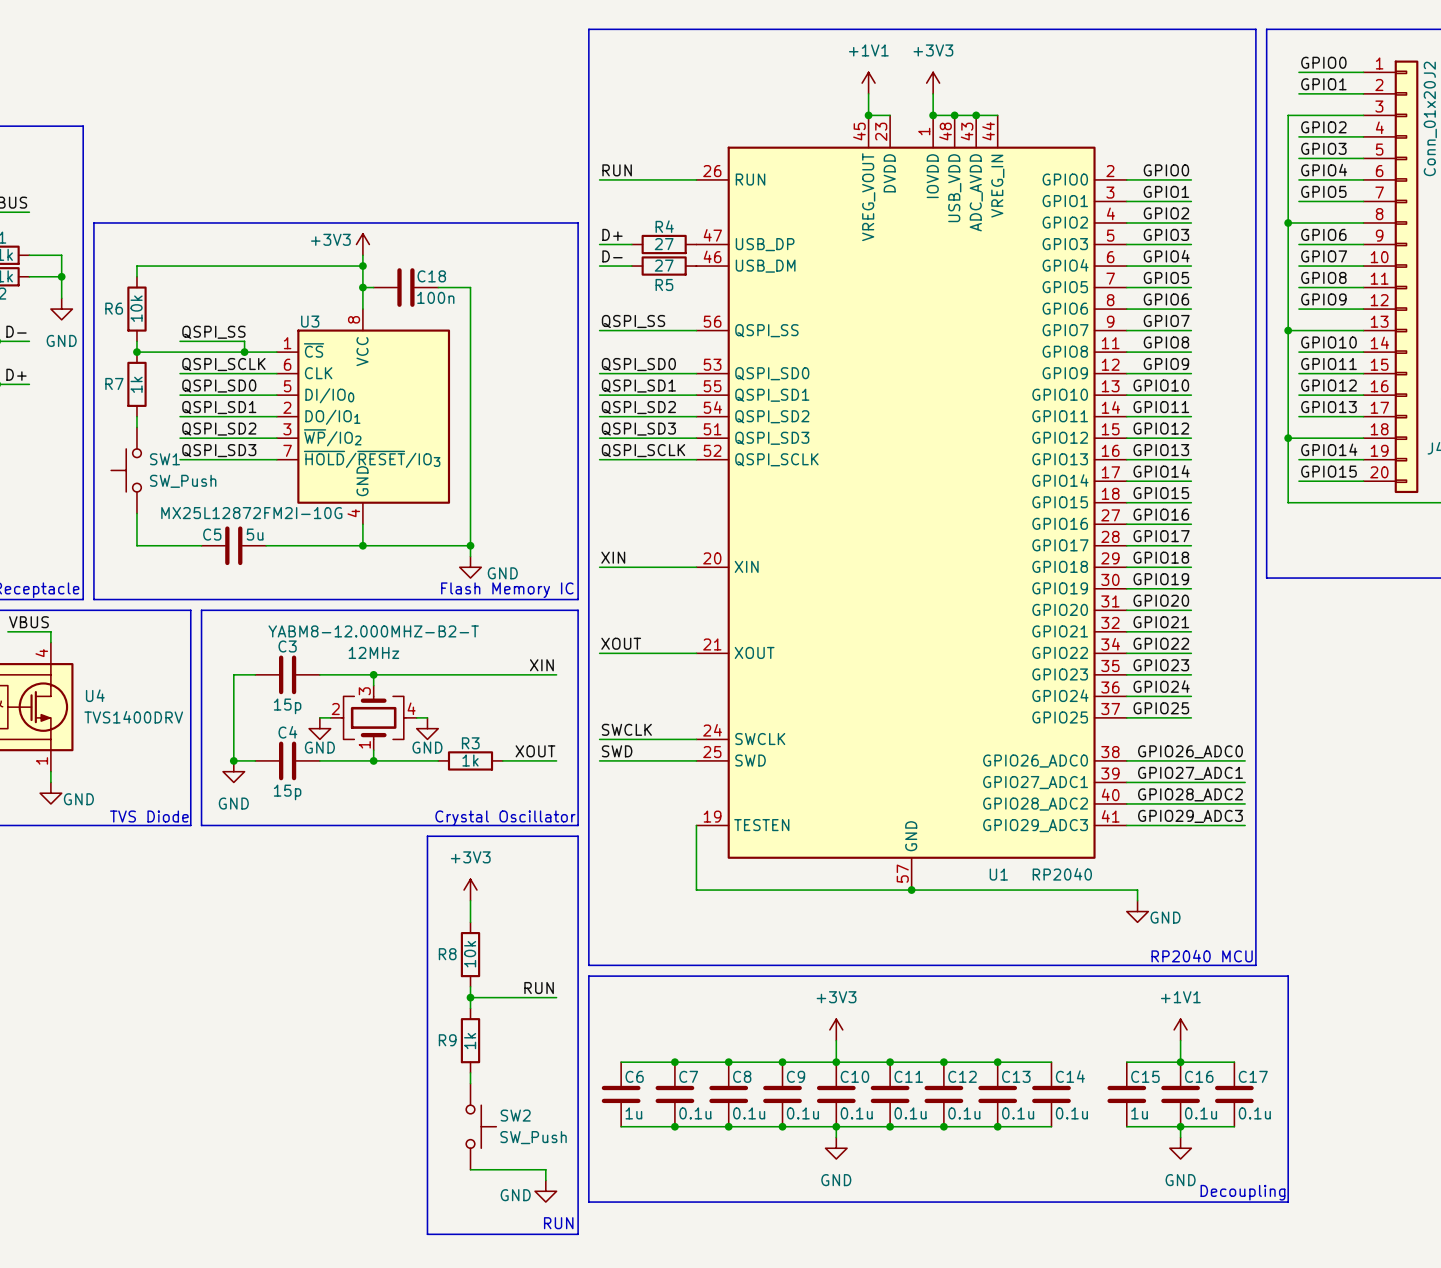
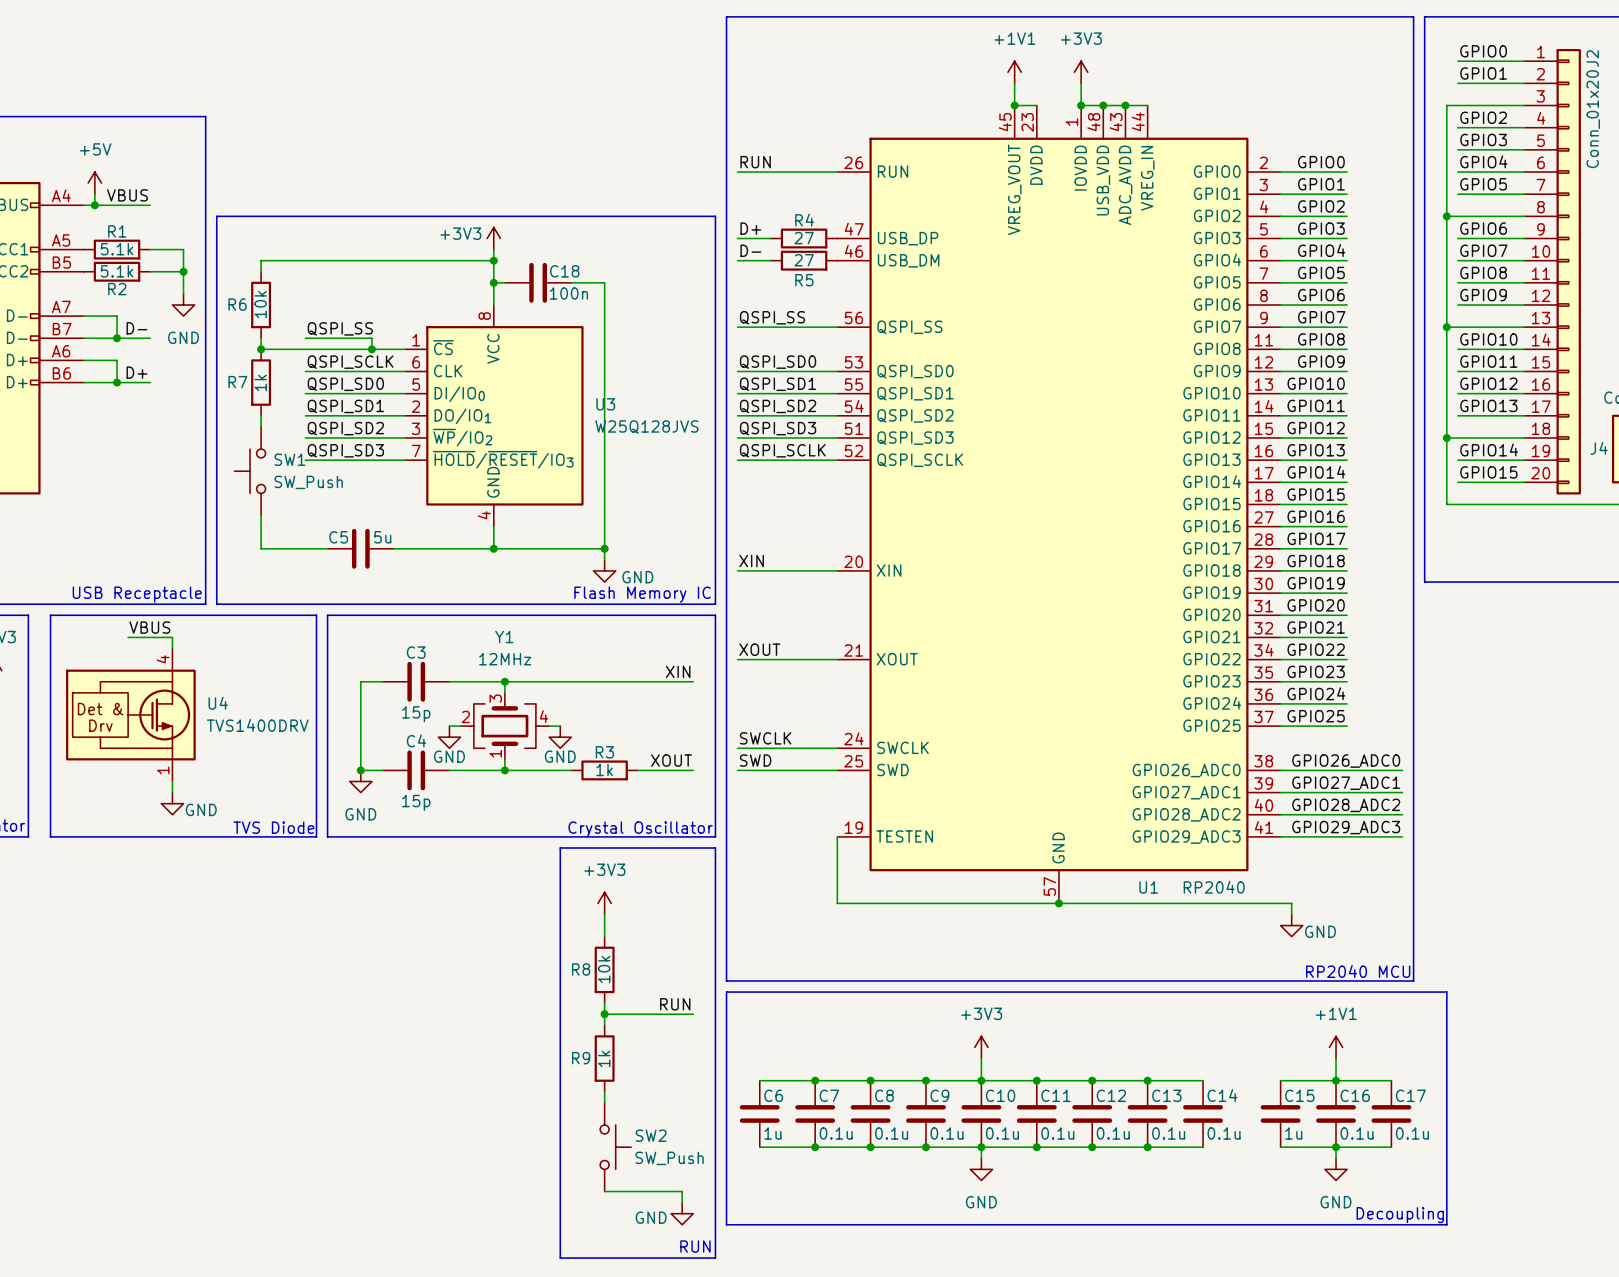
U3 name position: U3 (310, 321) -> U3 (605, 404)
U3 value: MX25L12872FM2I-10G (251, 513) -> W25Q128JVS (646, 427)
YABM8-12.000MHZ-B2-T name: YABM8-12.000MHZ-B2-T (373, 631) -> Y1 (504, 637)

